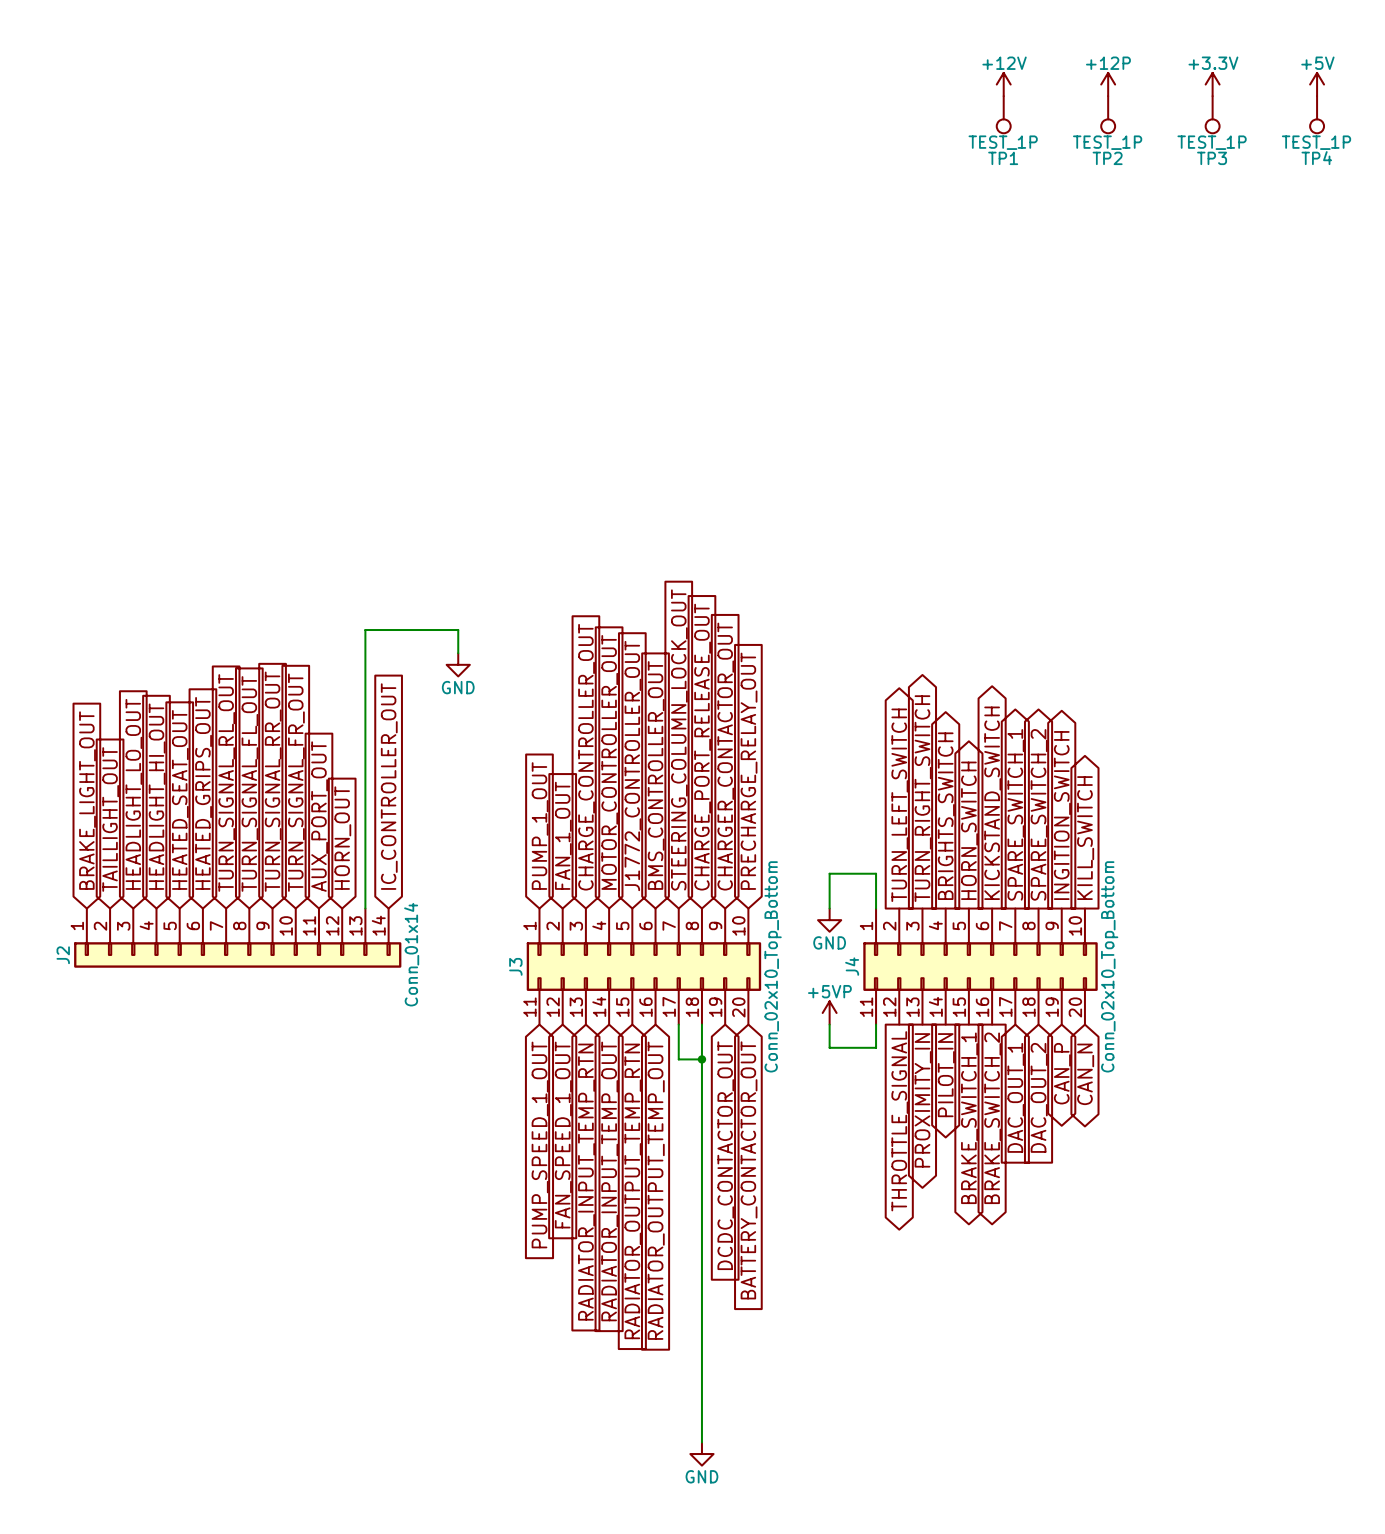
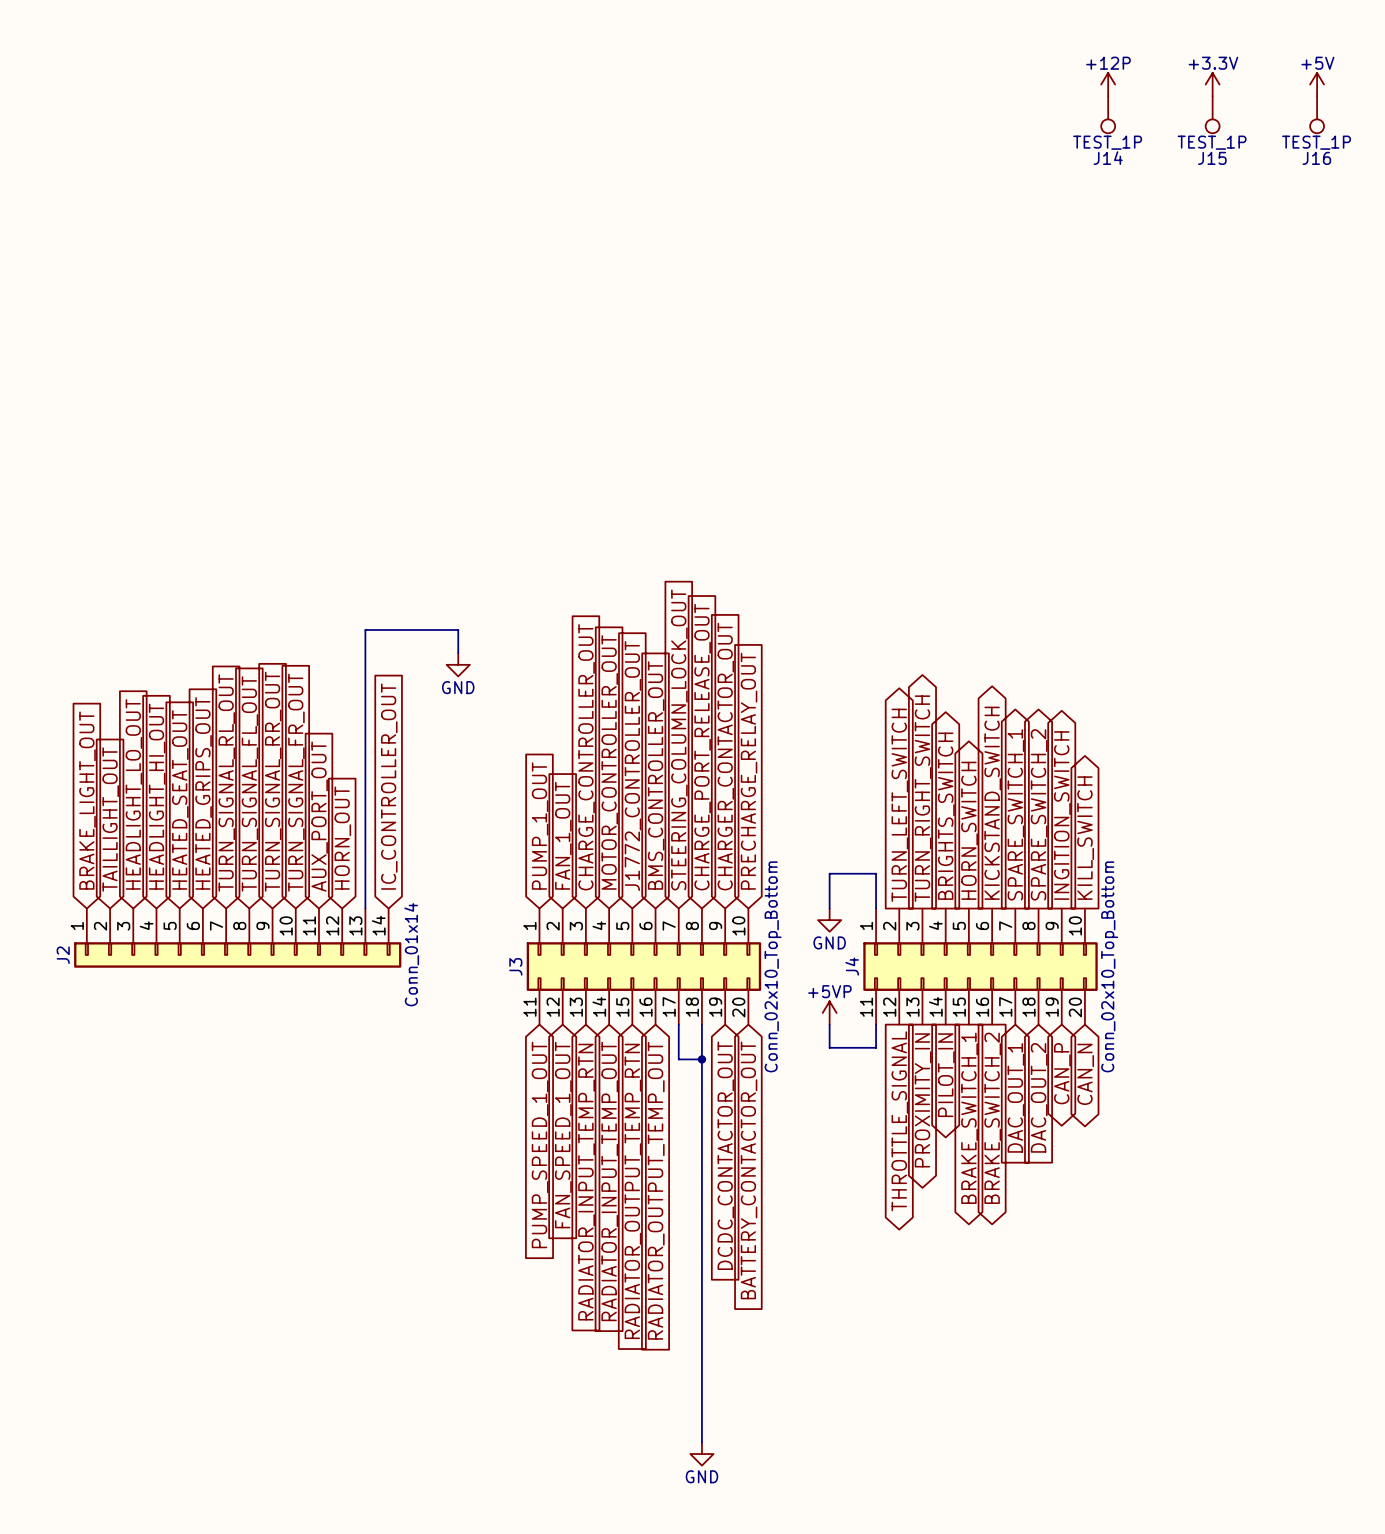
power symbol: +12V (1003, 84) -> none
TP1: TEST_1P (1003, 114) -> none
TP2 name: TP2 (1107, 158) -> J14 (1108, 158)
TP3 name: TP3 (1212, 158) -> J15 (1212, 158)
TP4 name: TP4 (1316, 158) -> J16 (1316, 158)

